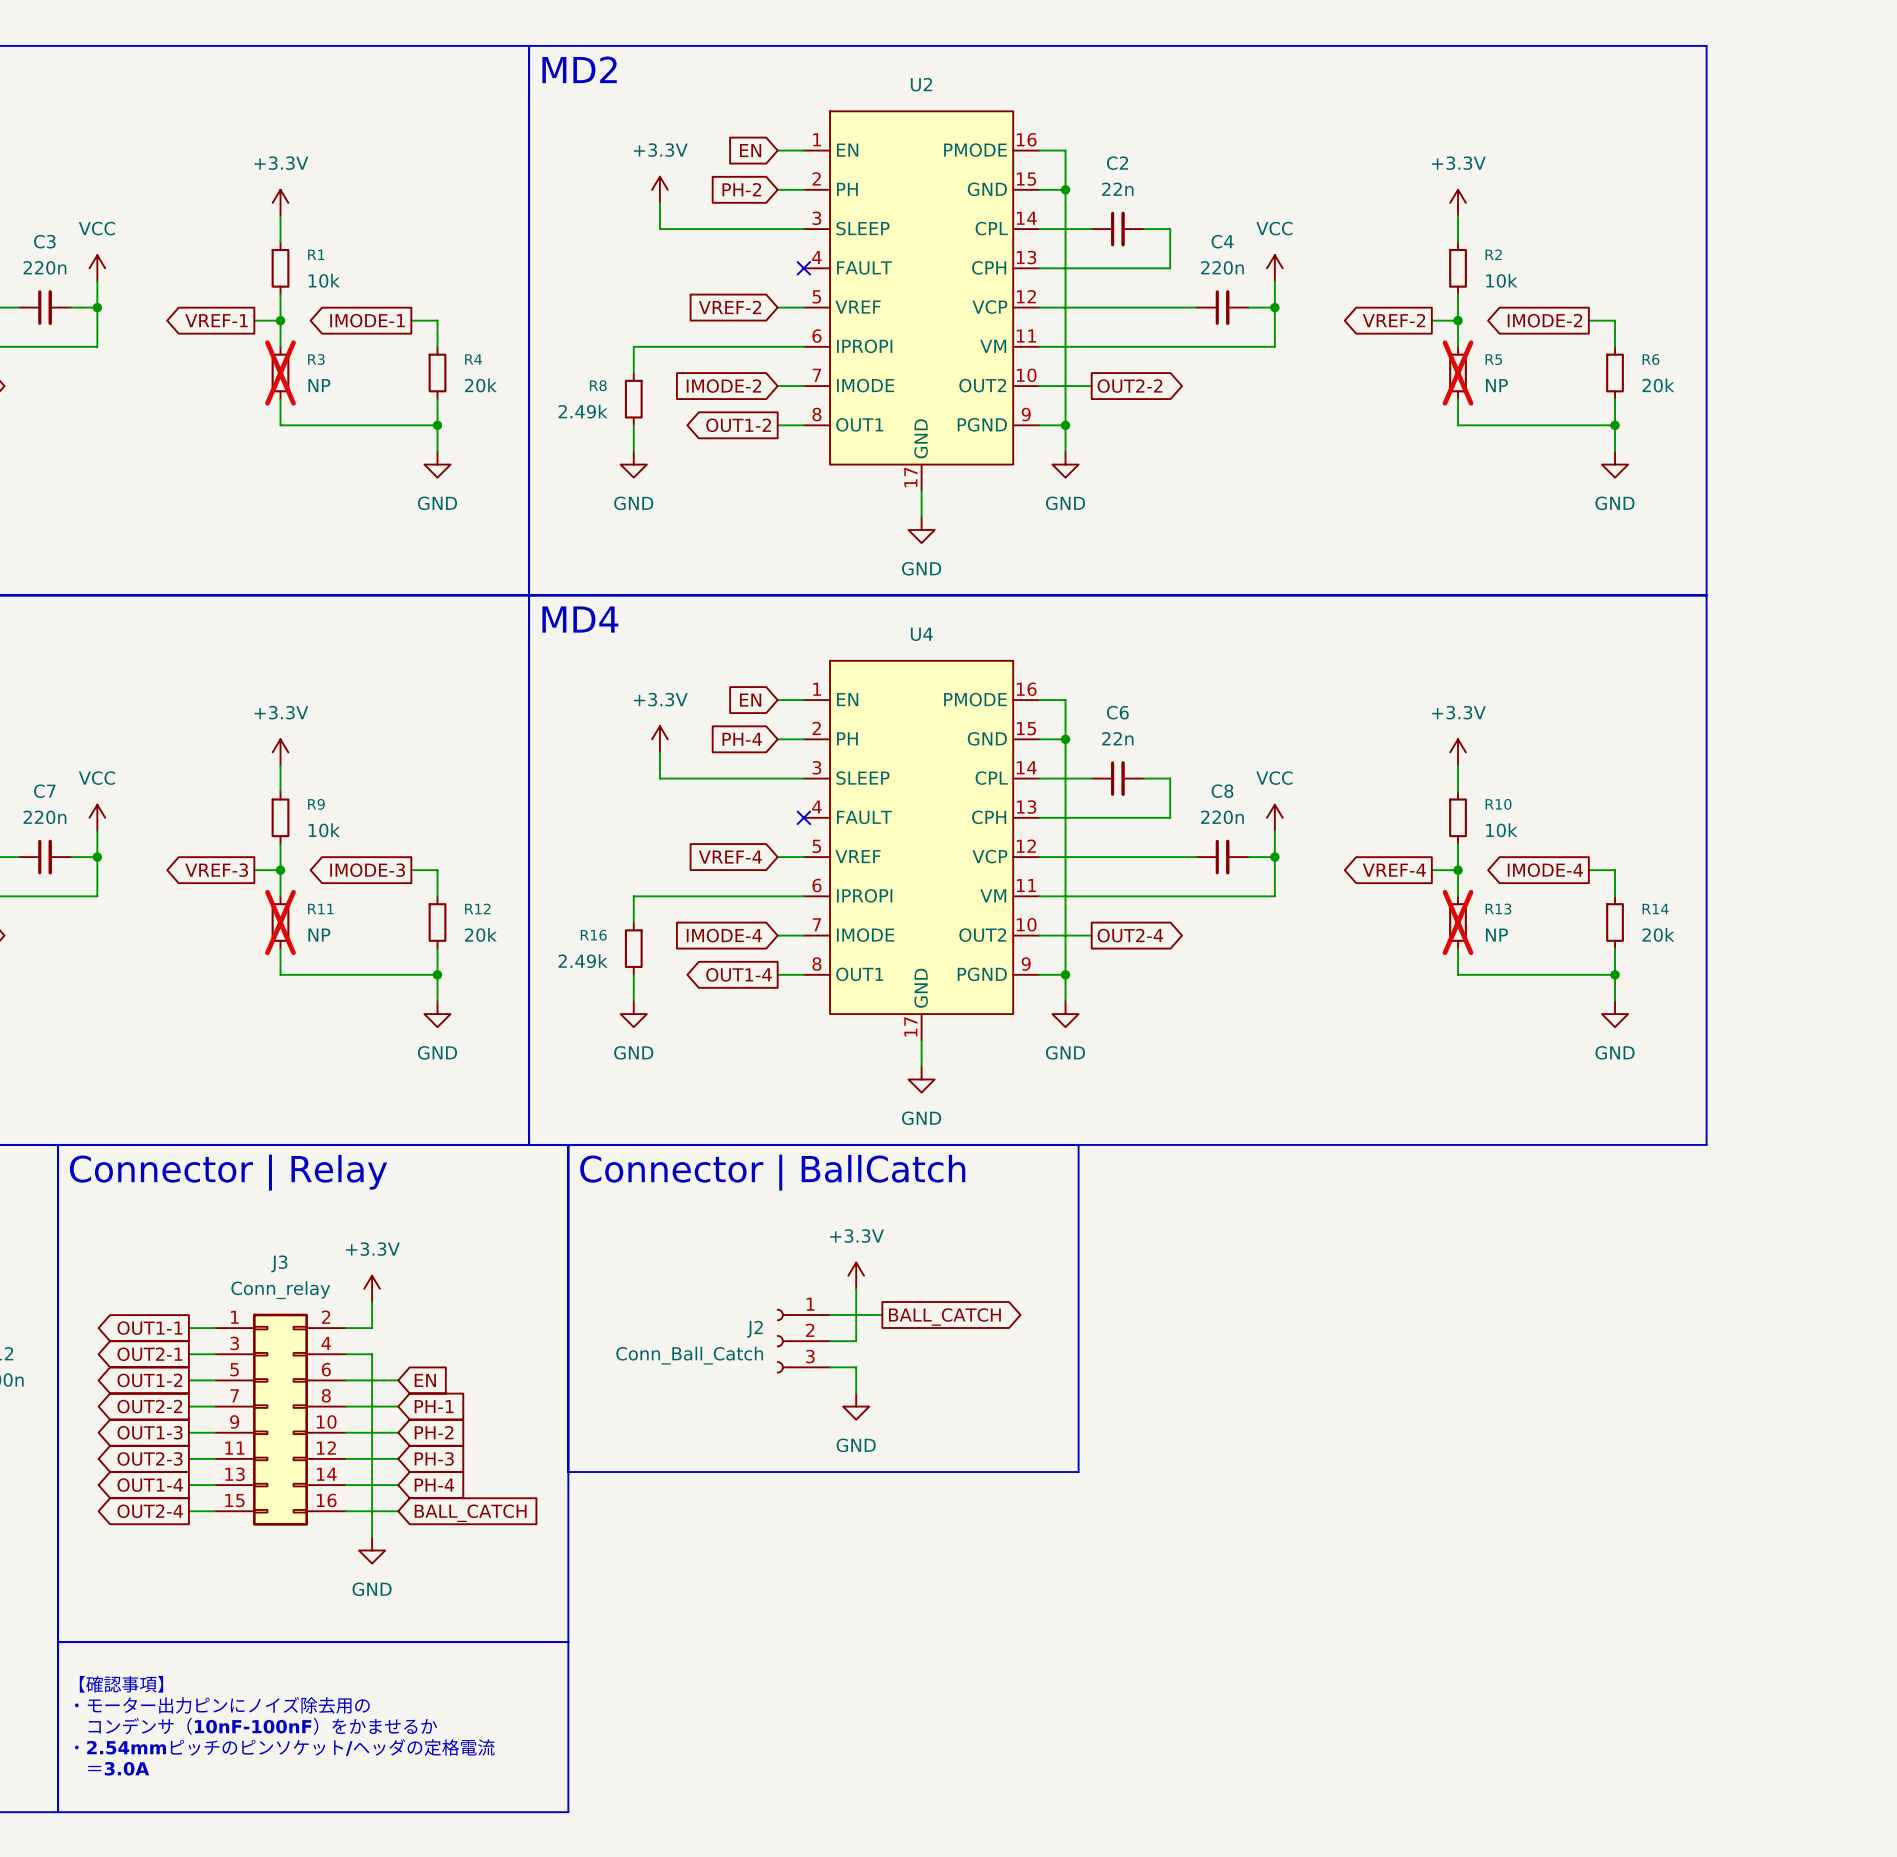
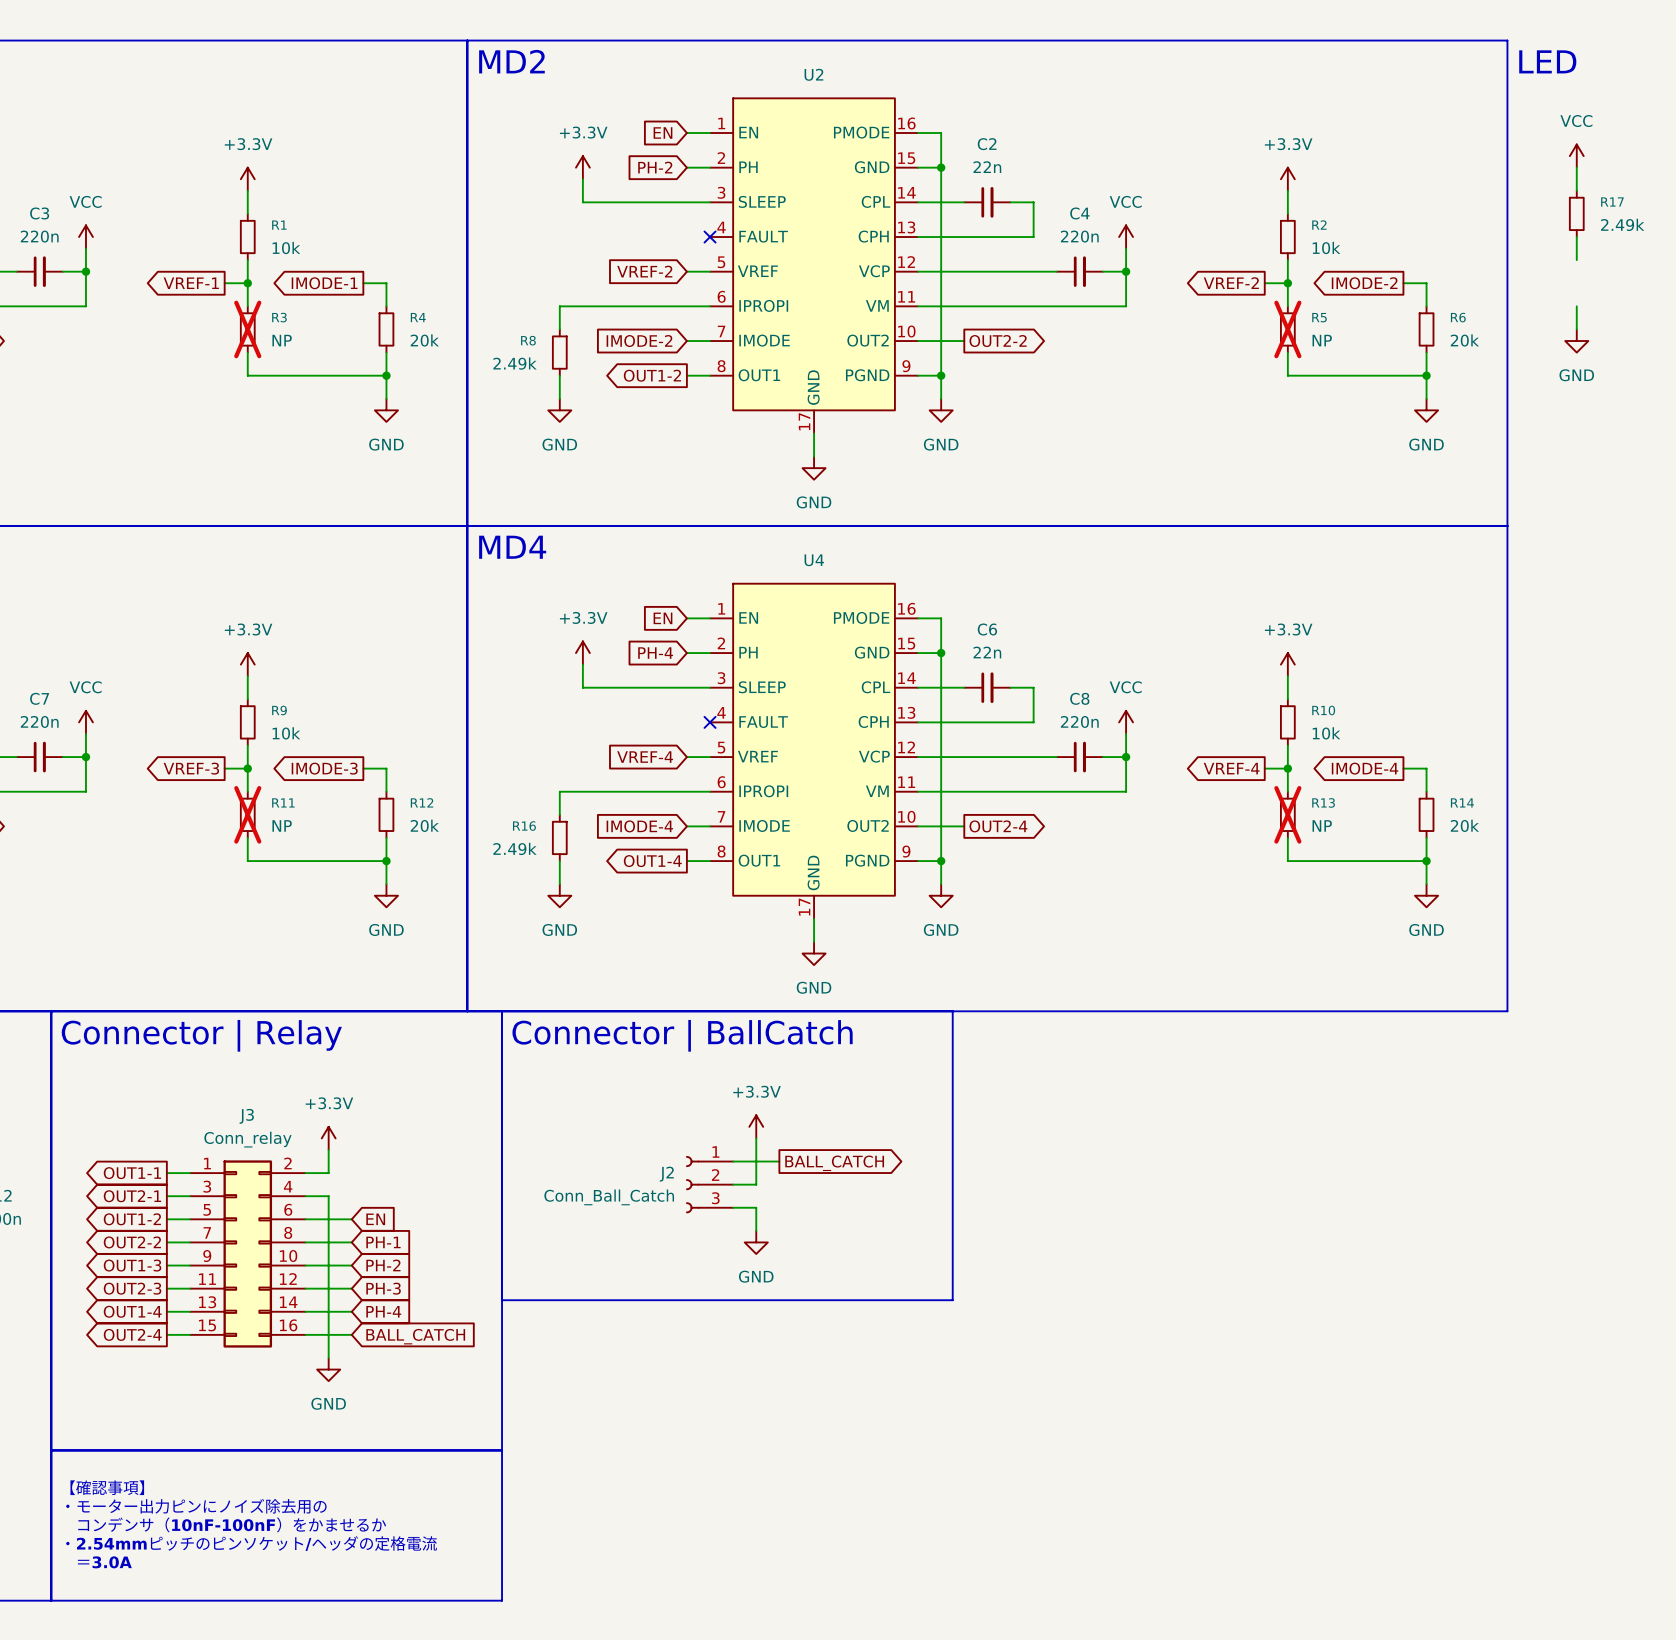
text: none -> LED (1547, 61)
power symbol: none -> VCC (1576, 156)
wire: none -> (1576, 167) (1576, 190)
R17: none -> 2.49k (1576, 213)
wire: none -> (1576, 237) (1576, 260)
wire: none -> (1576, 306) (1576, 329)
power symbol: none -> GND (1576, 341)

